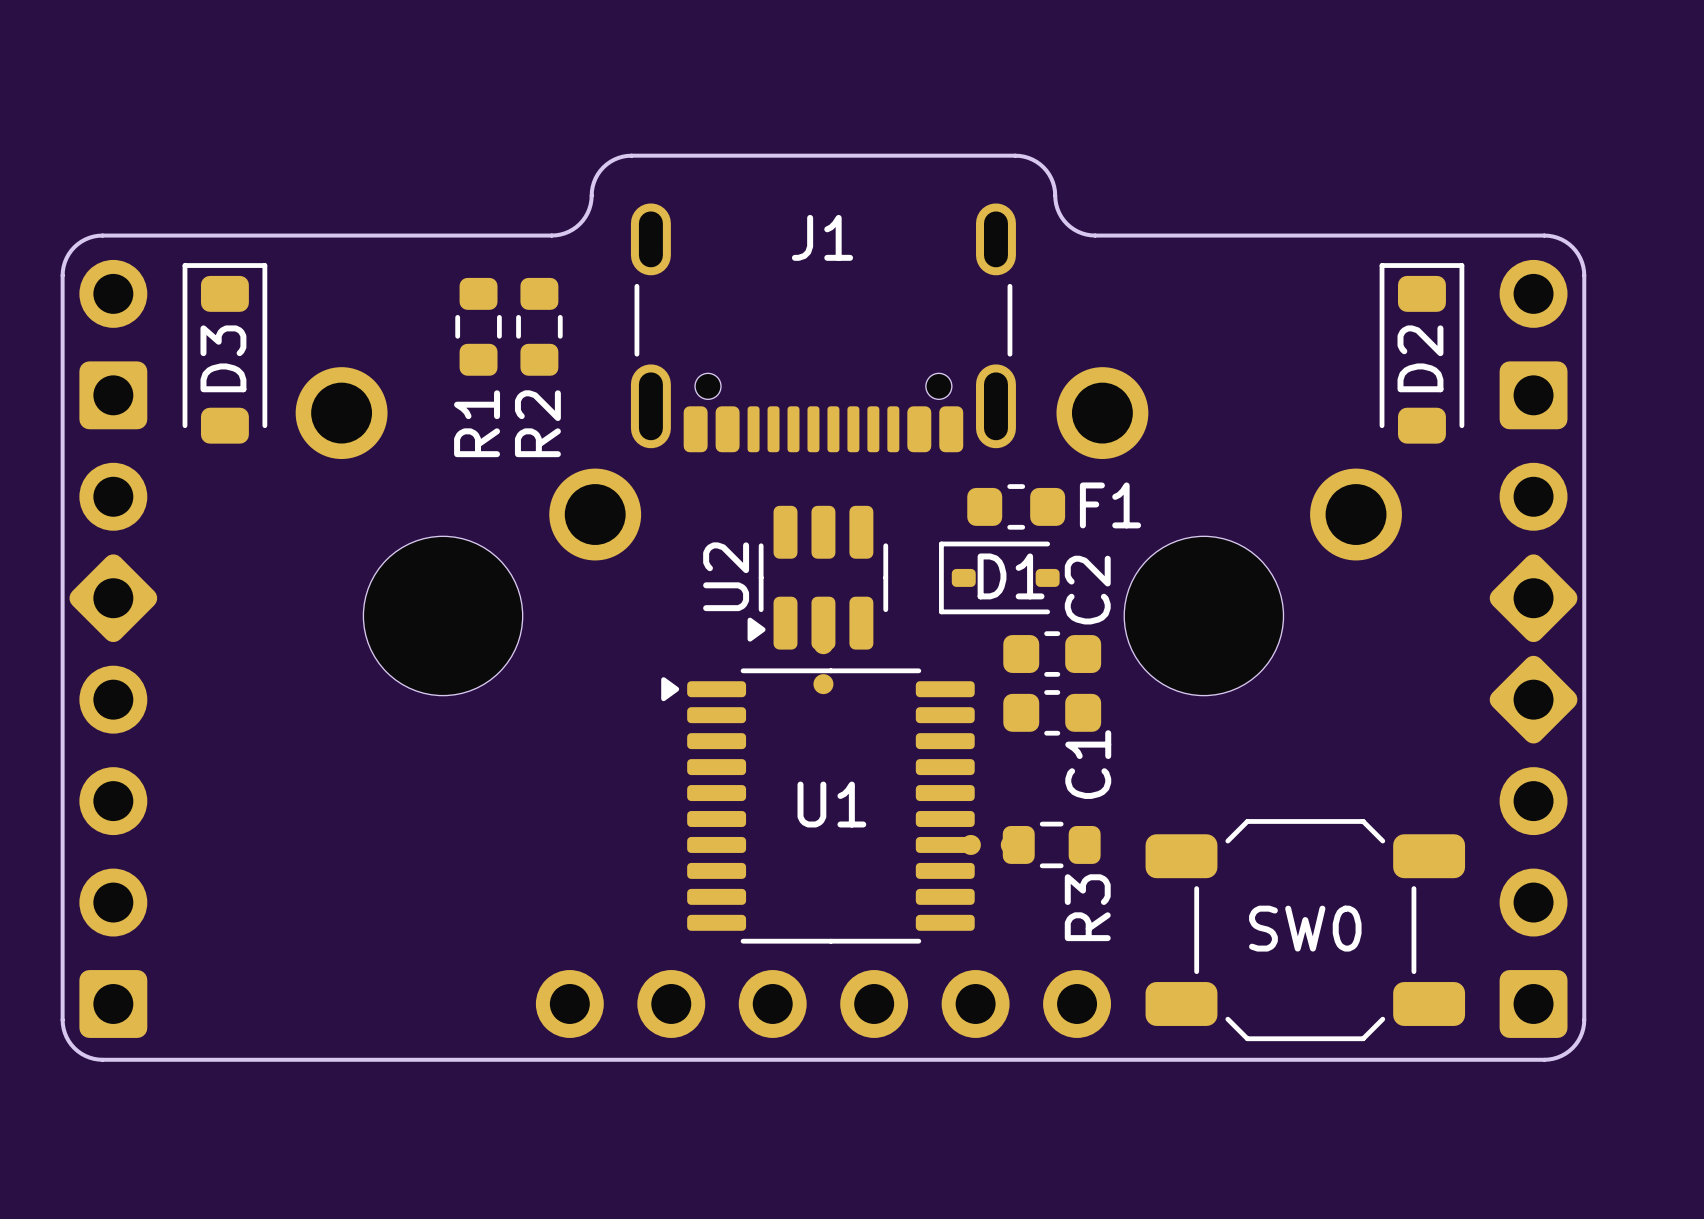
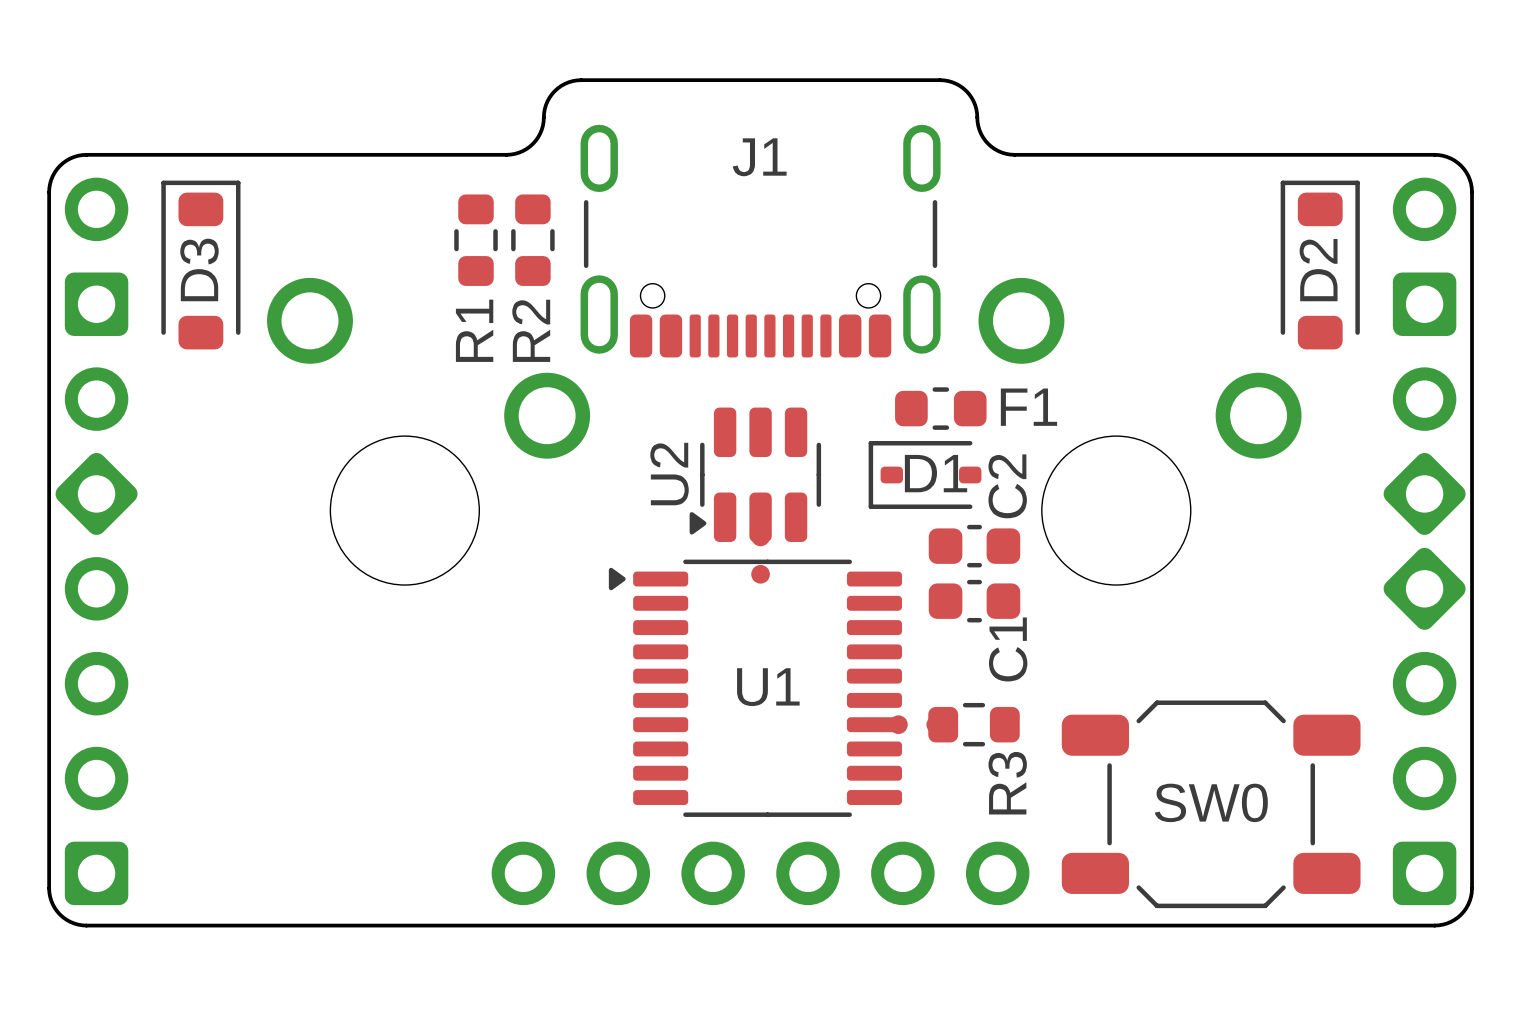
R1 position: (478, 326) -> (475, 240)
R2 position: (539, 326) -> (532, 240)

